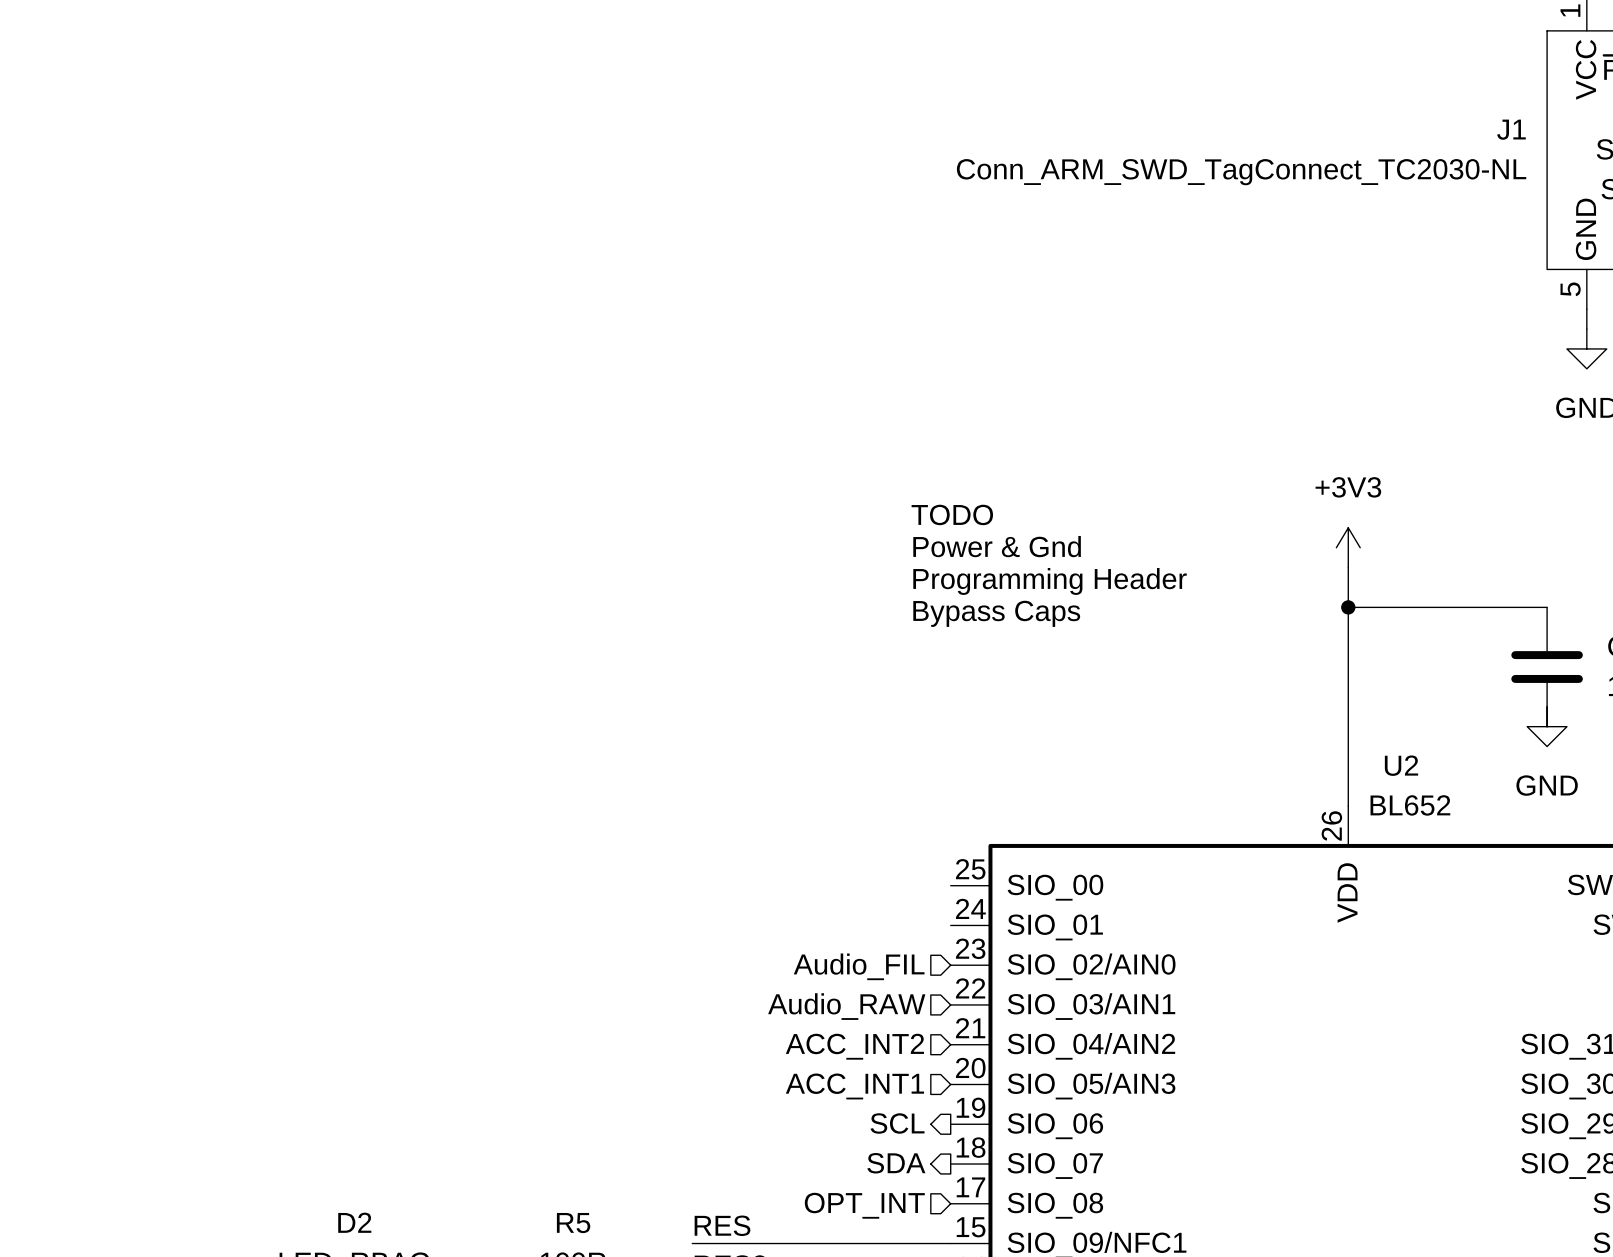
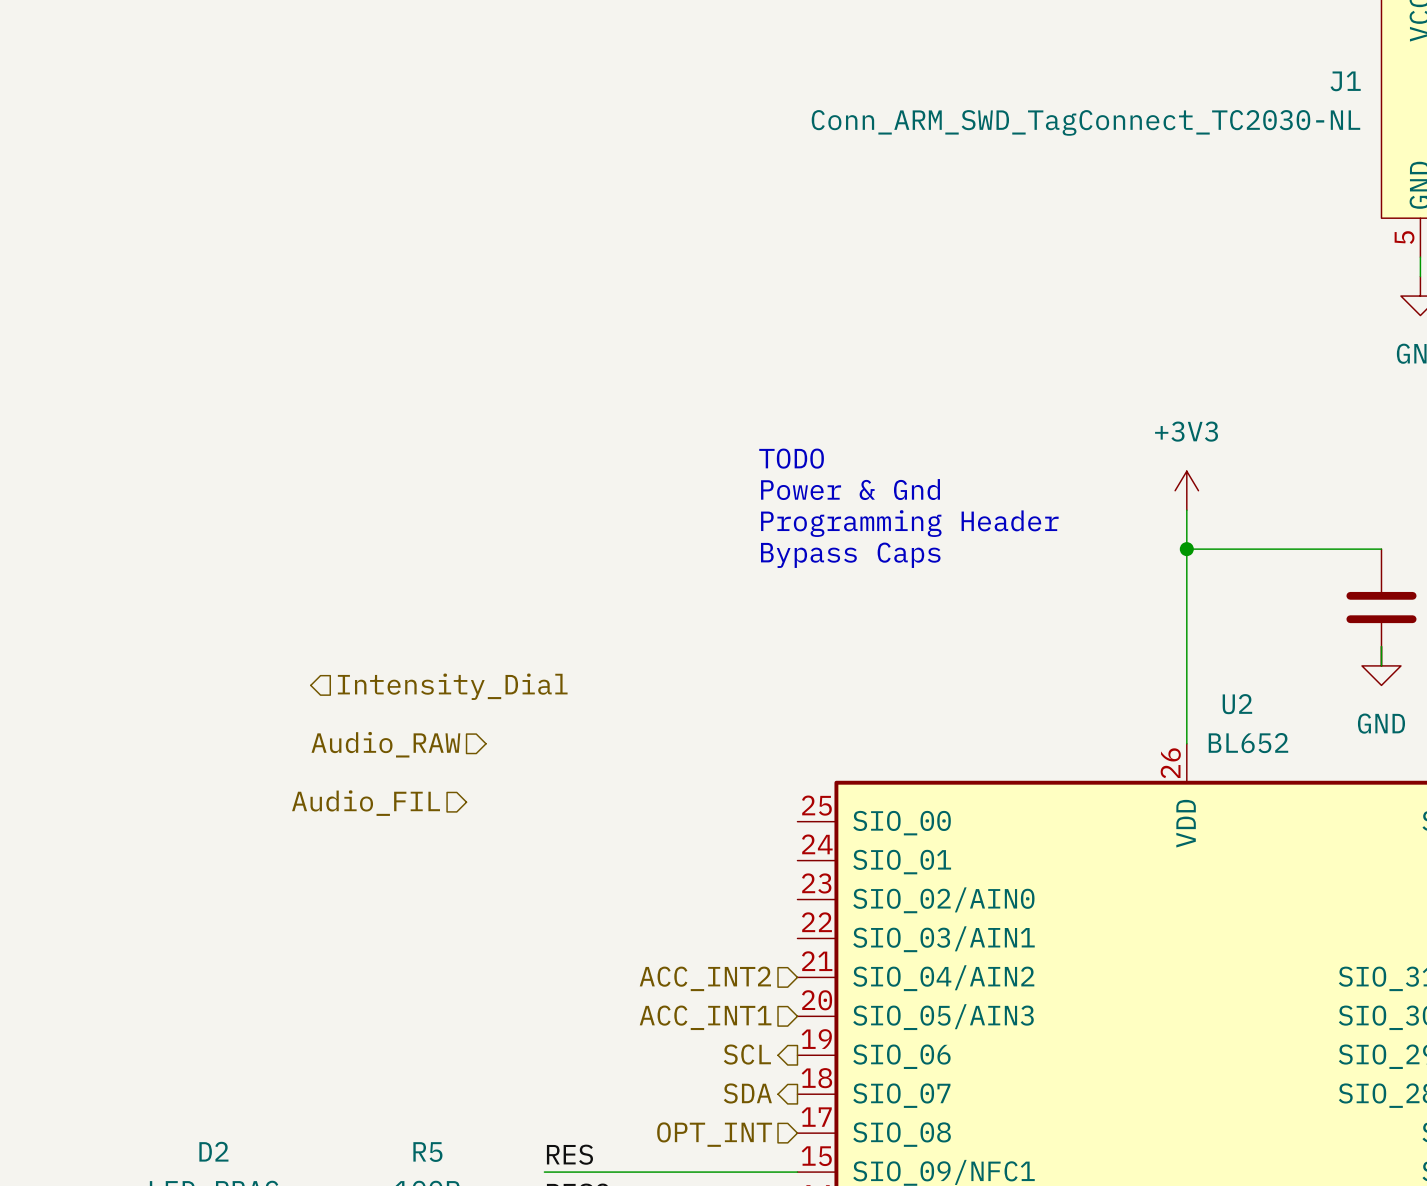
hierarchical label: none -> Intensity_Dial (452, 686)
hierarchical label position: Audio_FIL (859, 966) -> Audio_FIL (366, 803)
hierarchical label position: Audio_RAW (846, 1006) -> Audio_RAW (385, 744)

